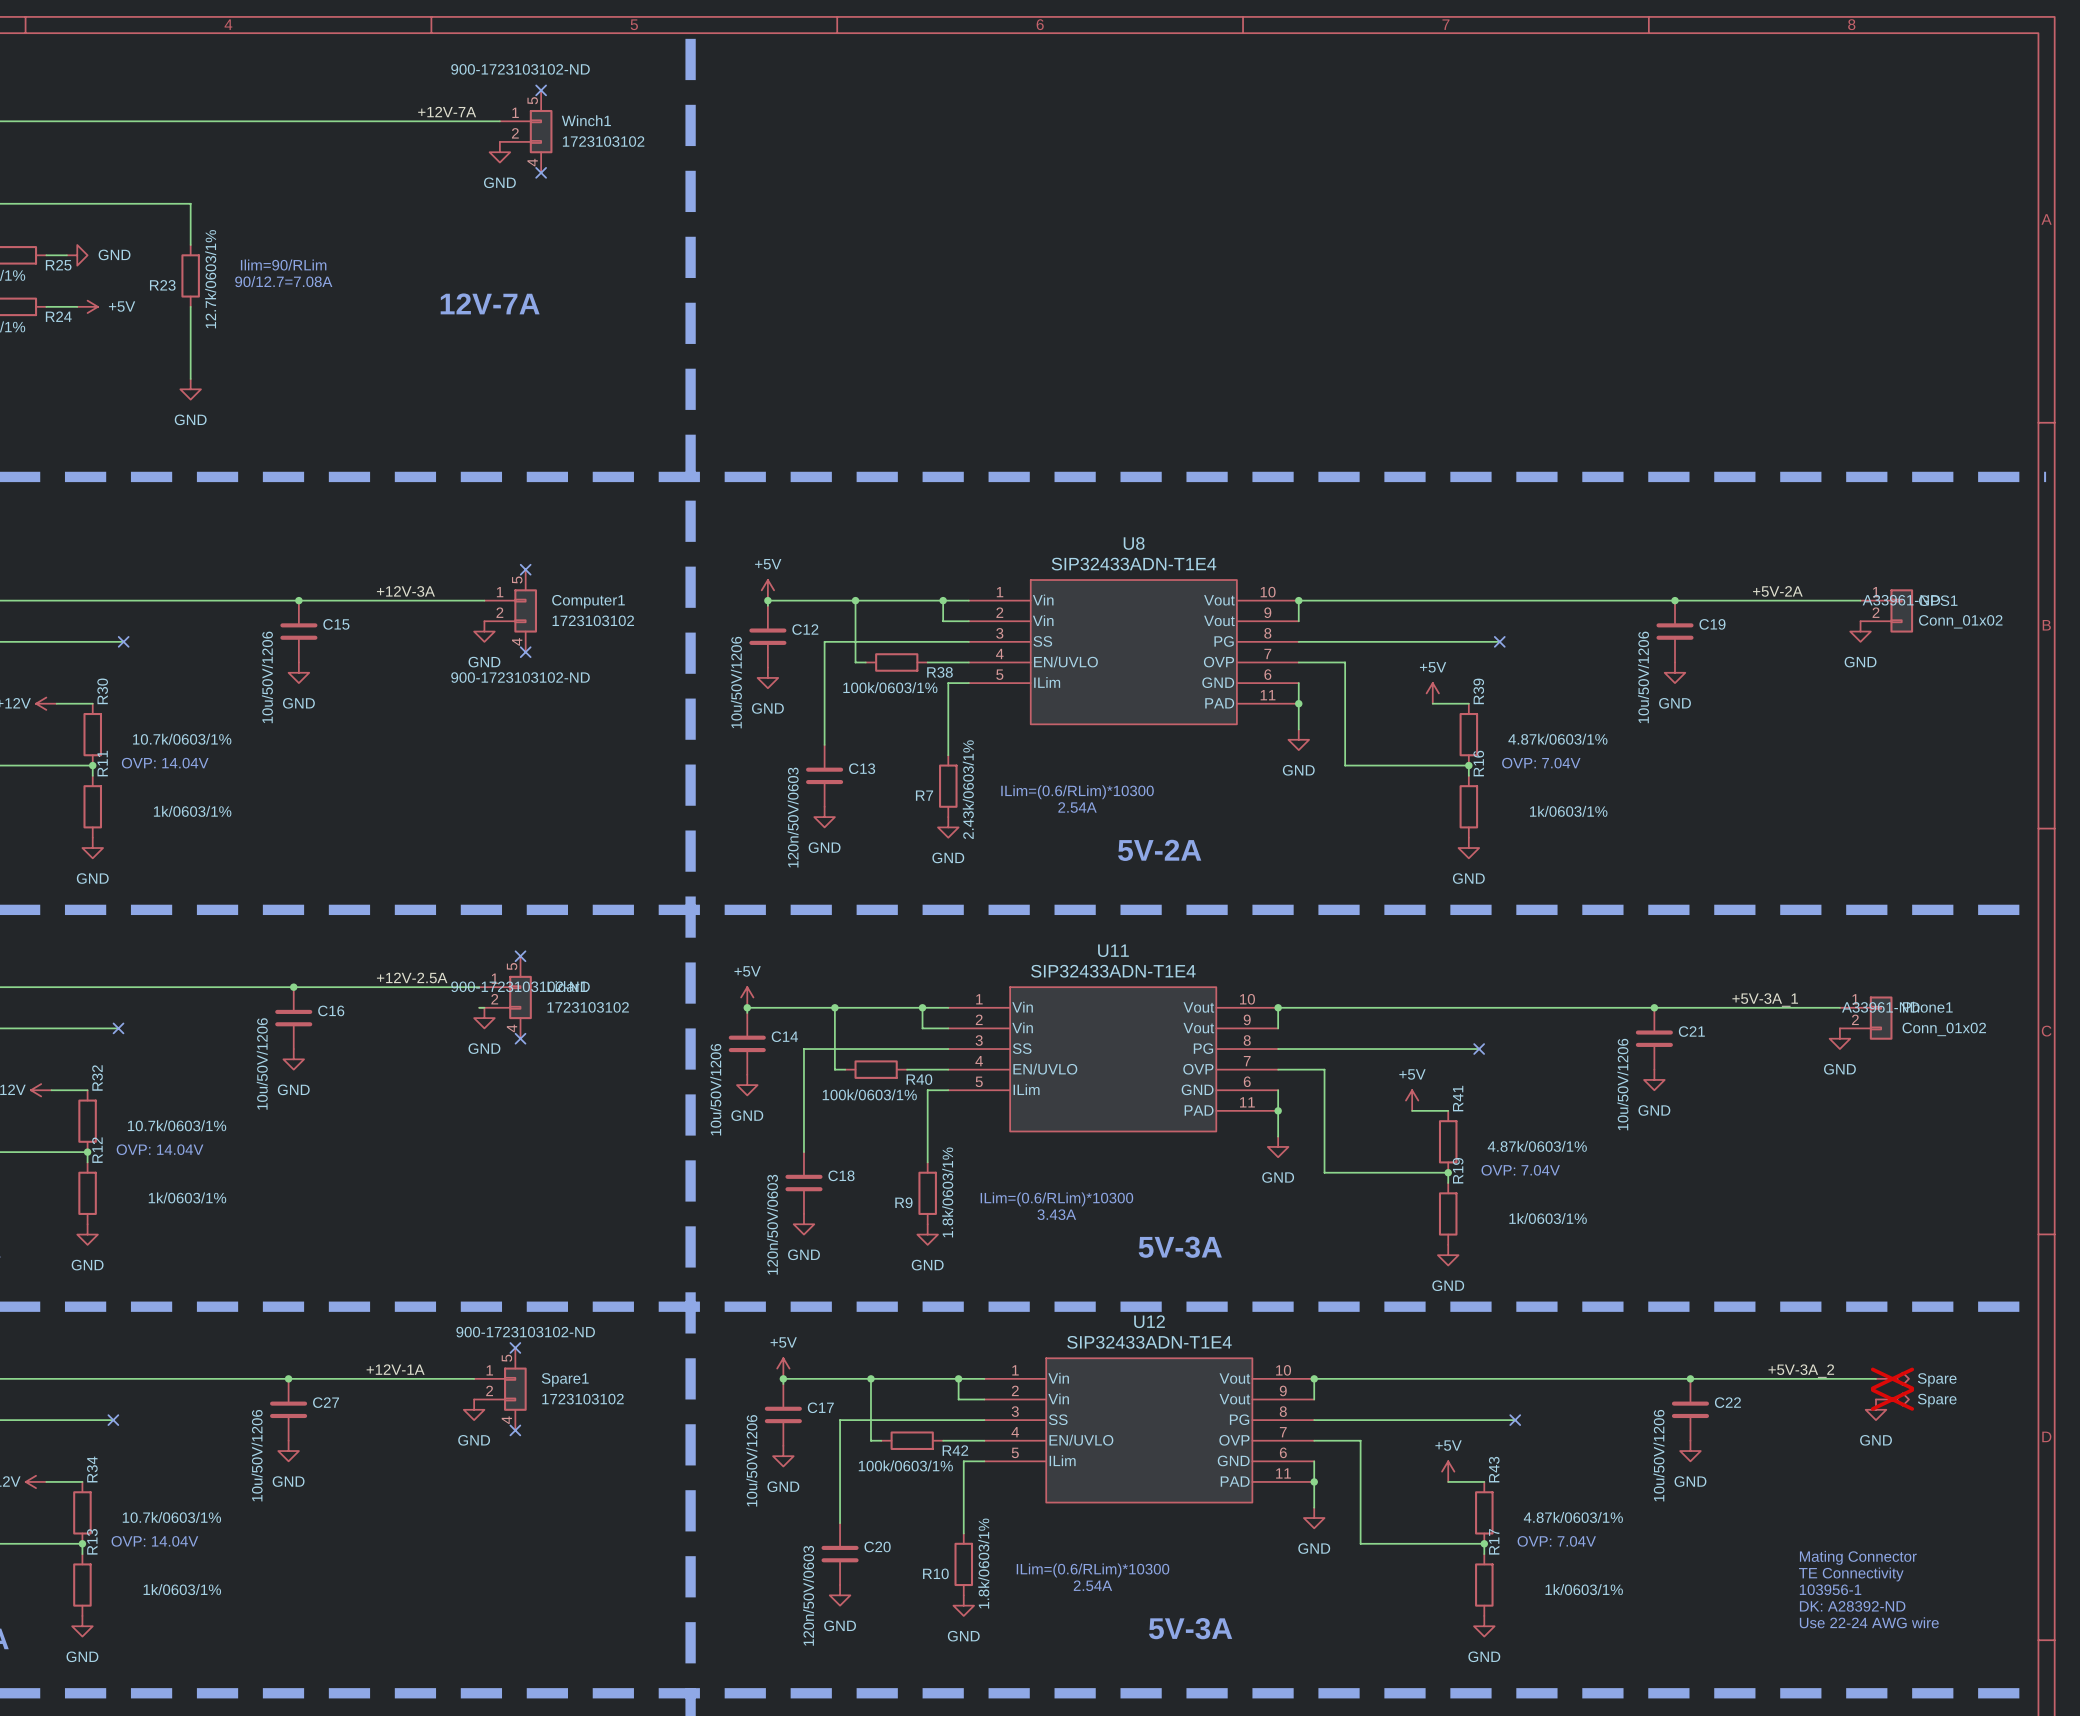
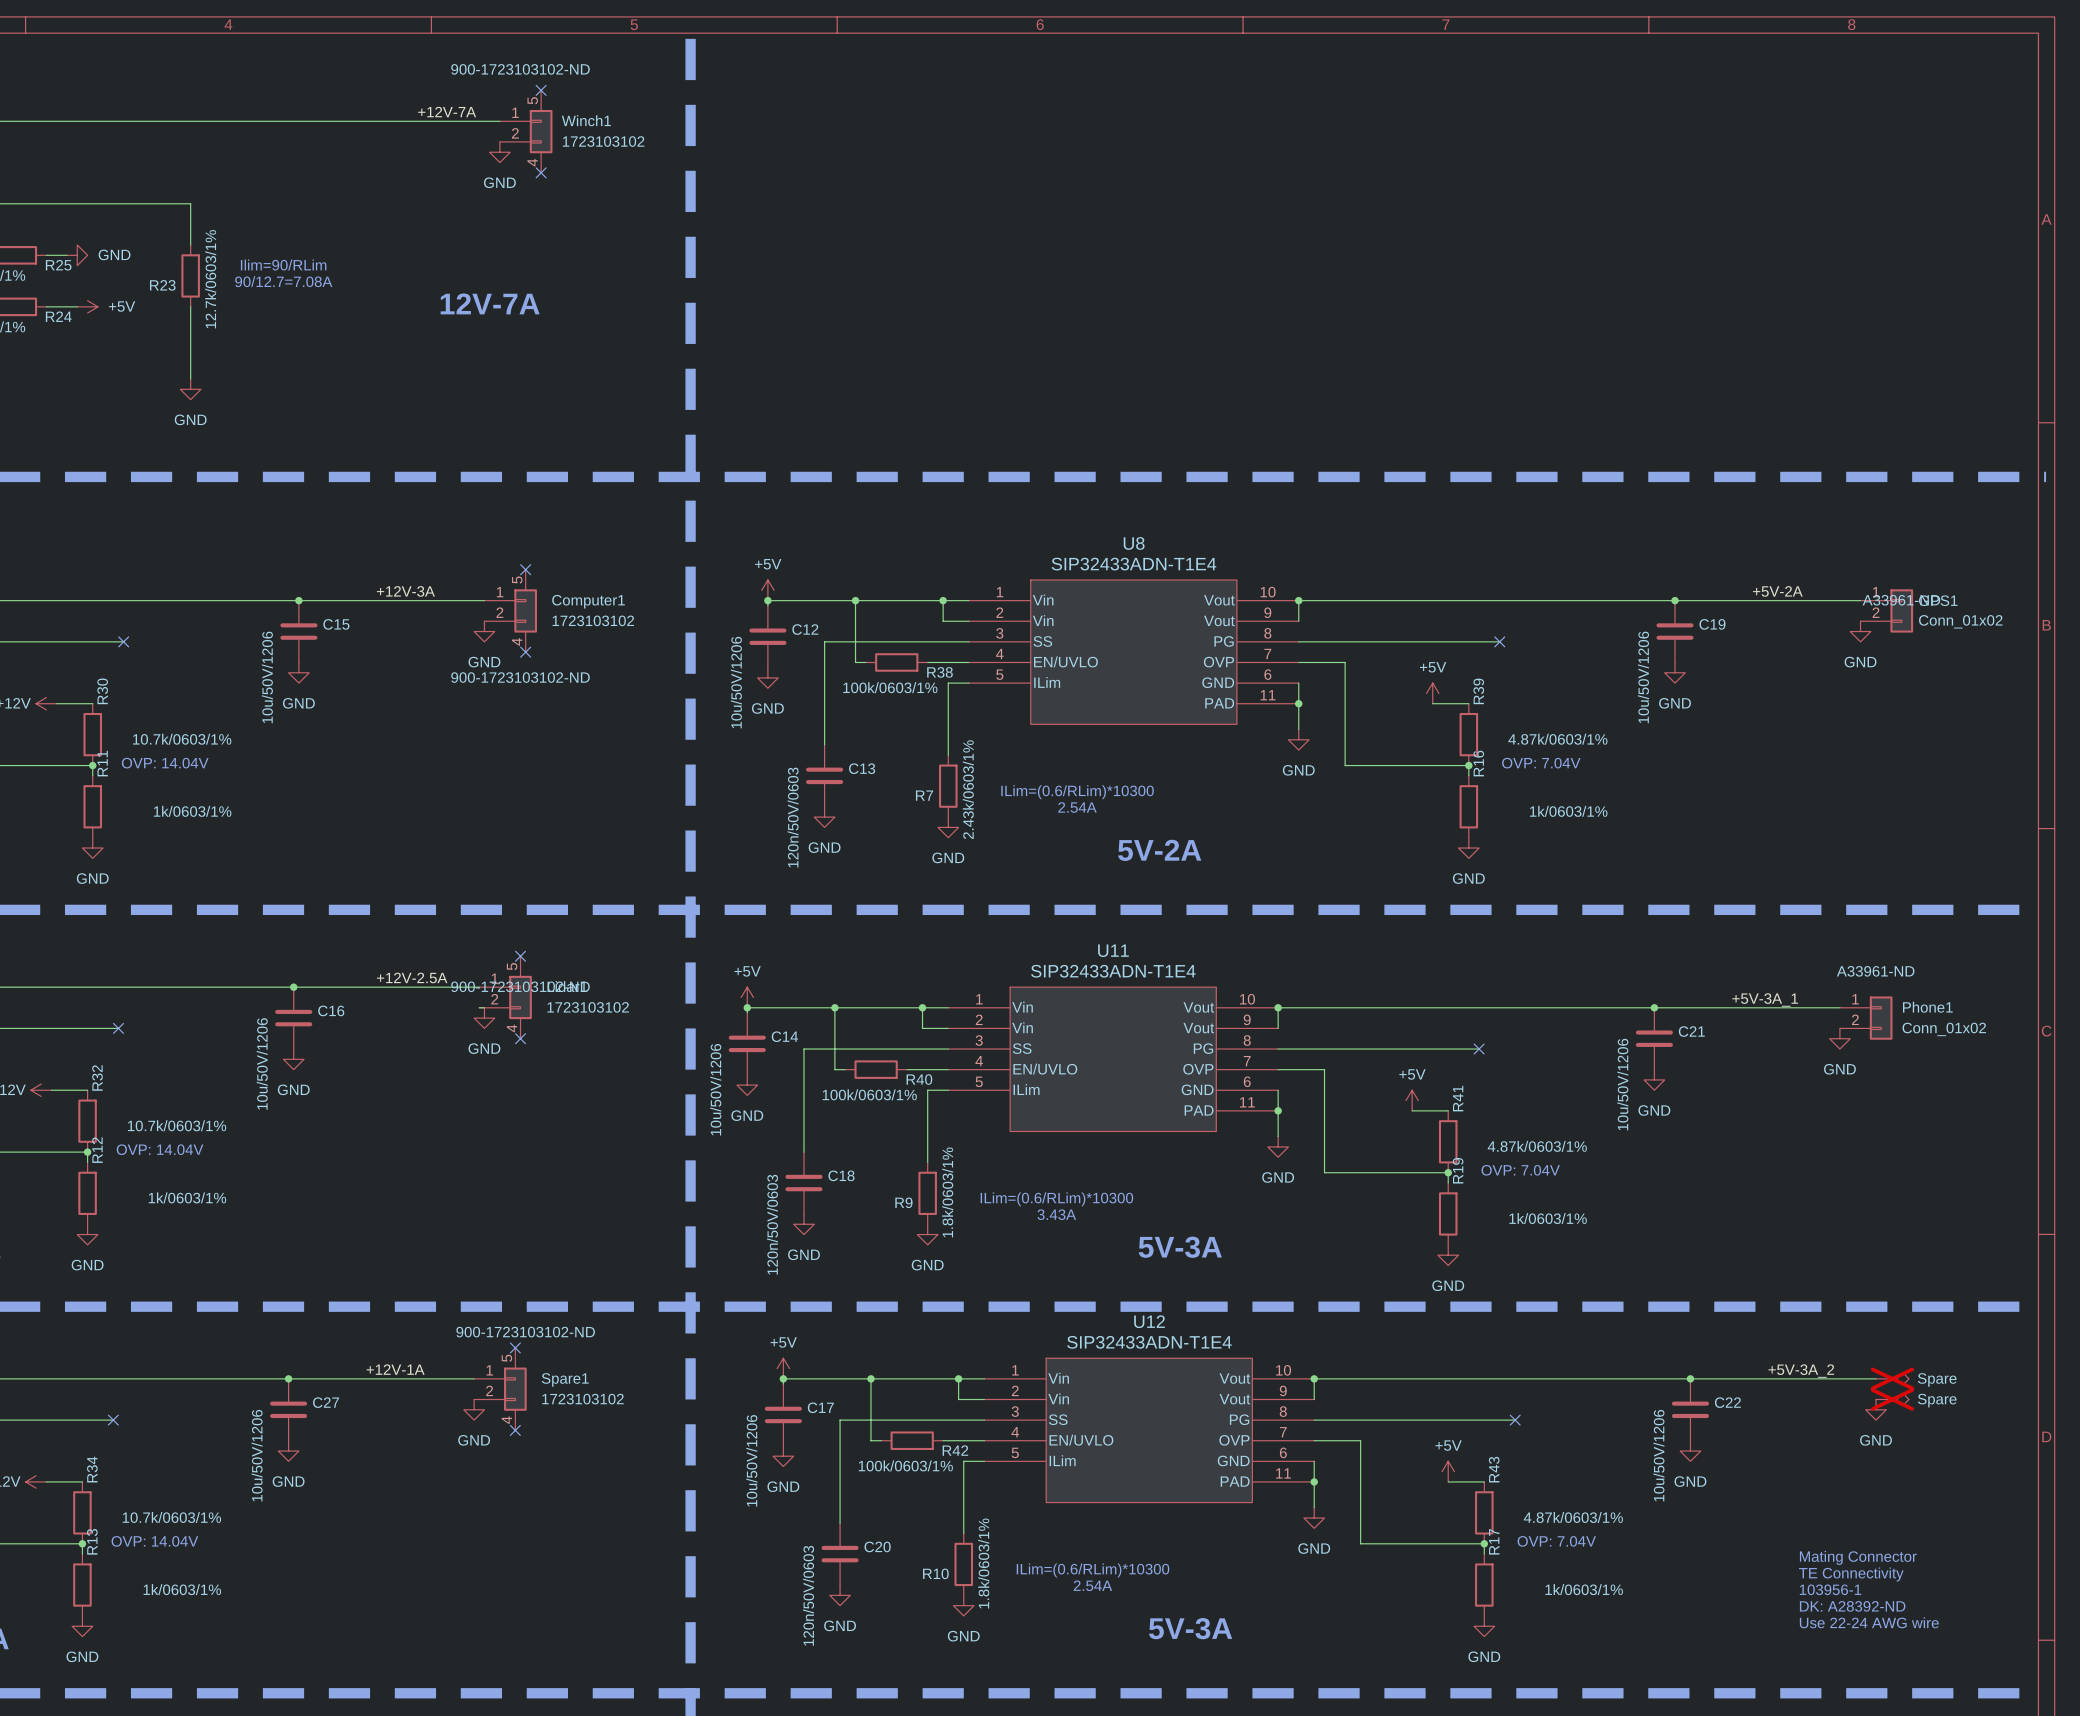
Phone1 text position: A33961-ND (1880, 1007) -> A33961-ND (1875, 971)

